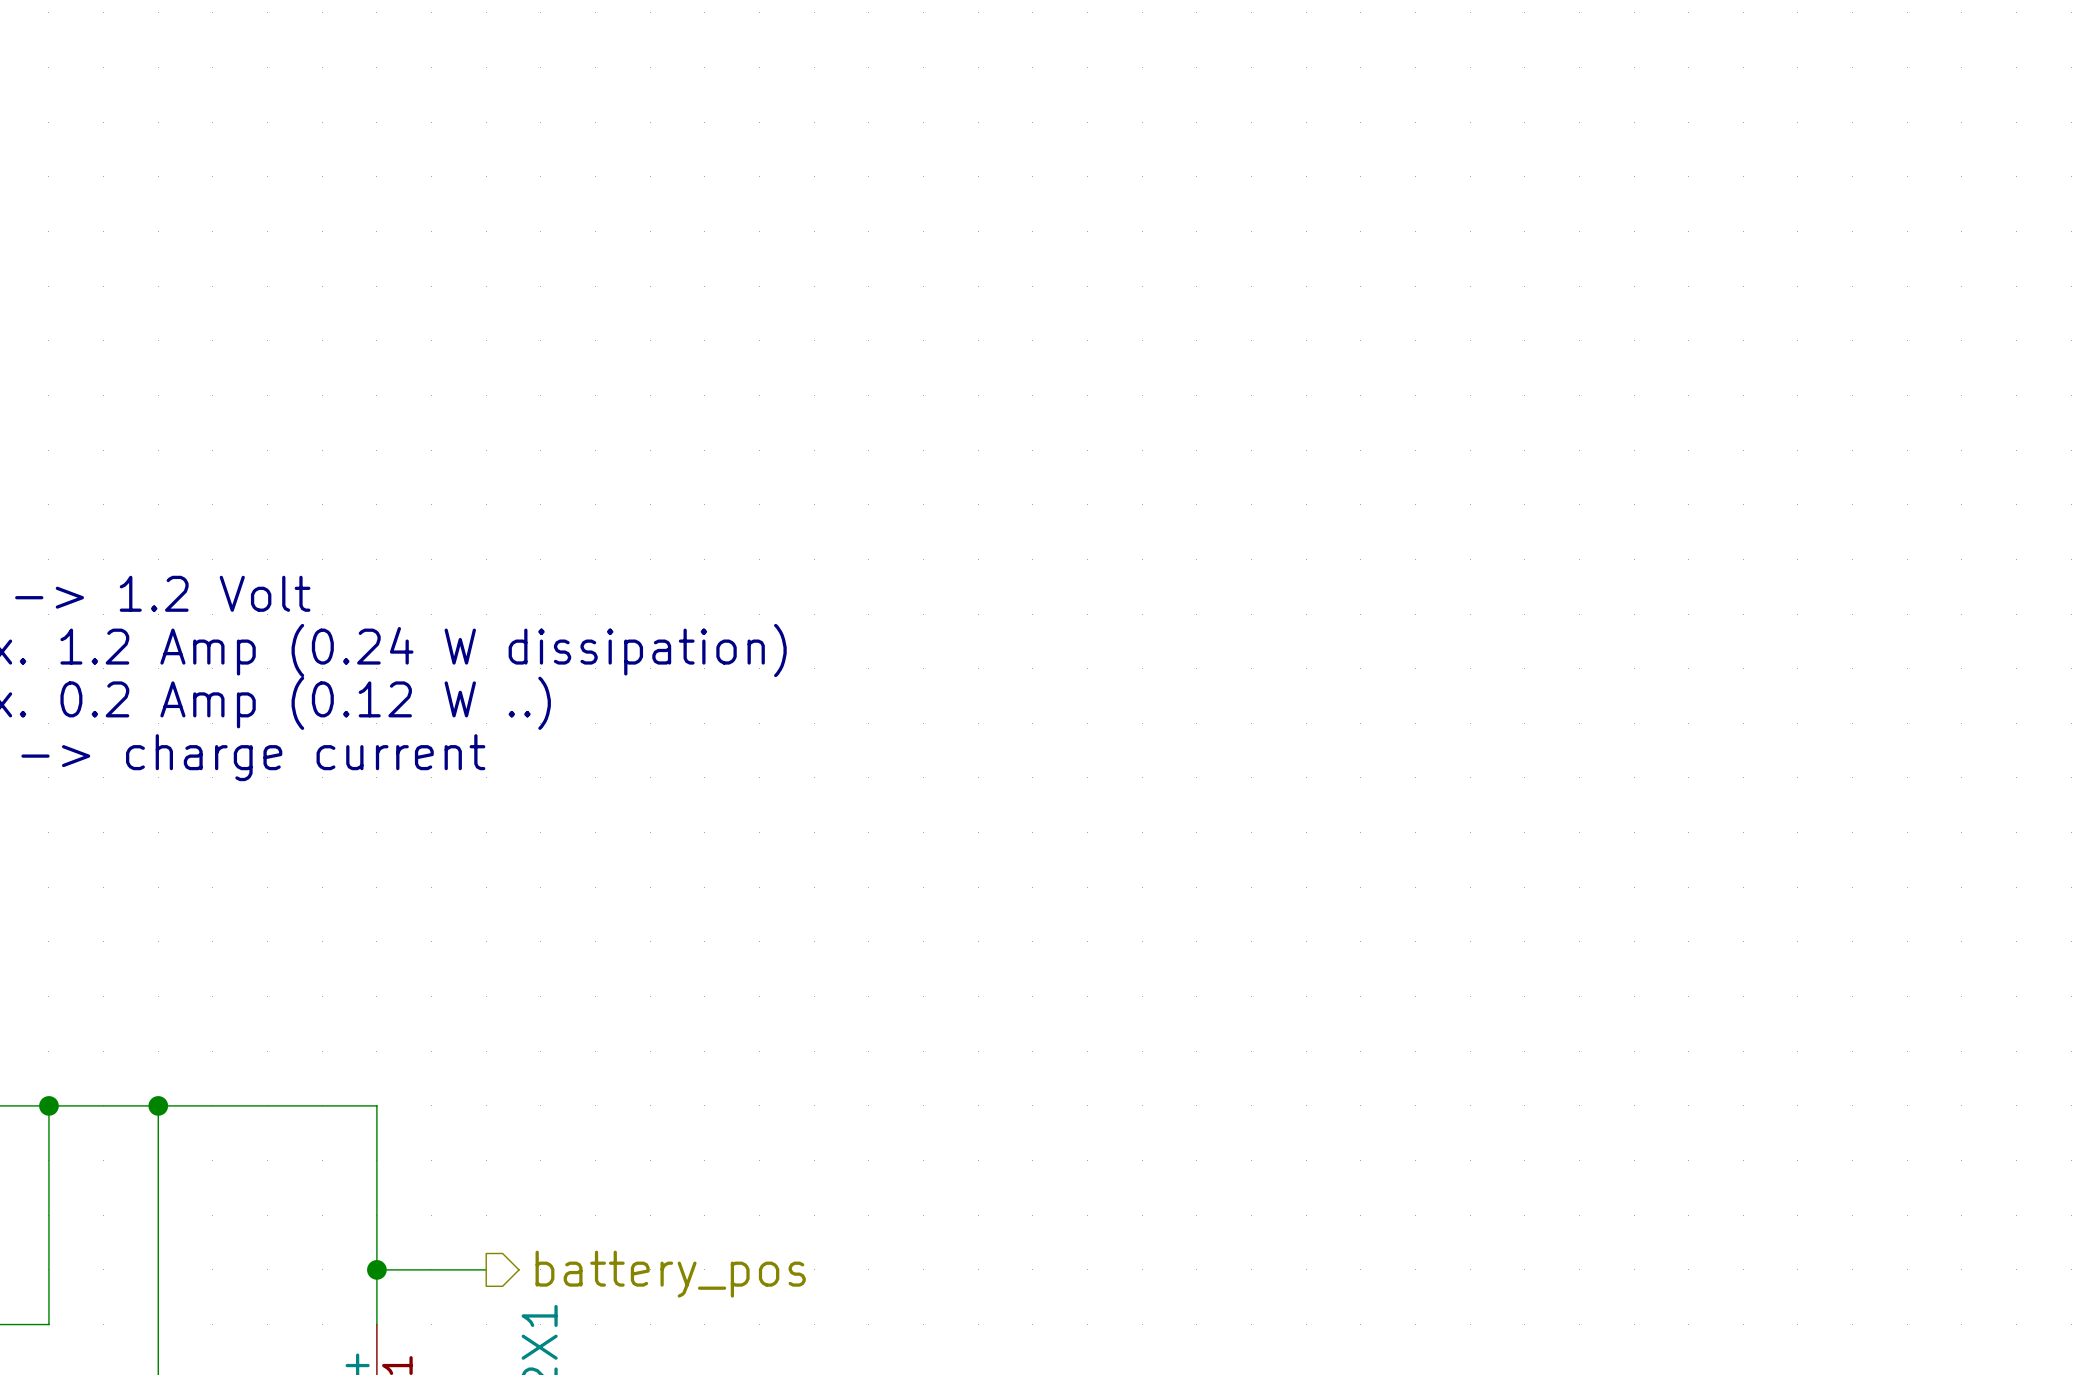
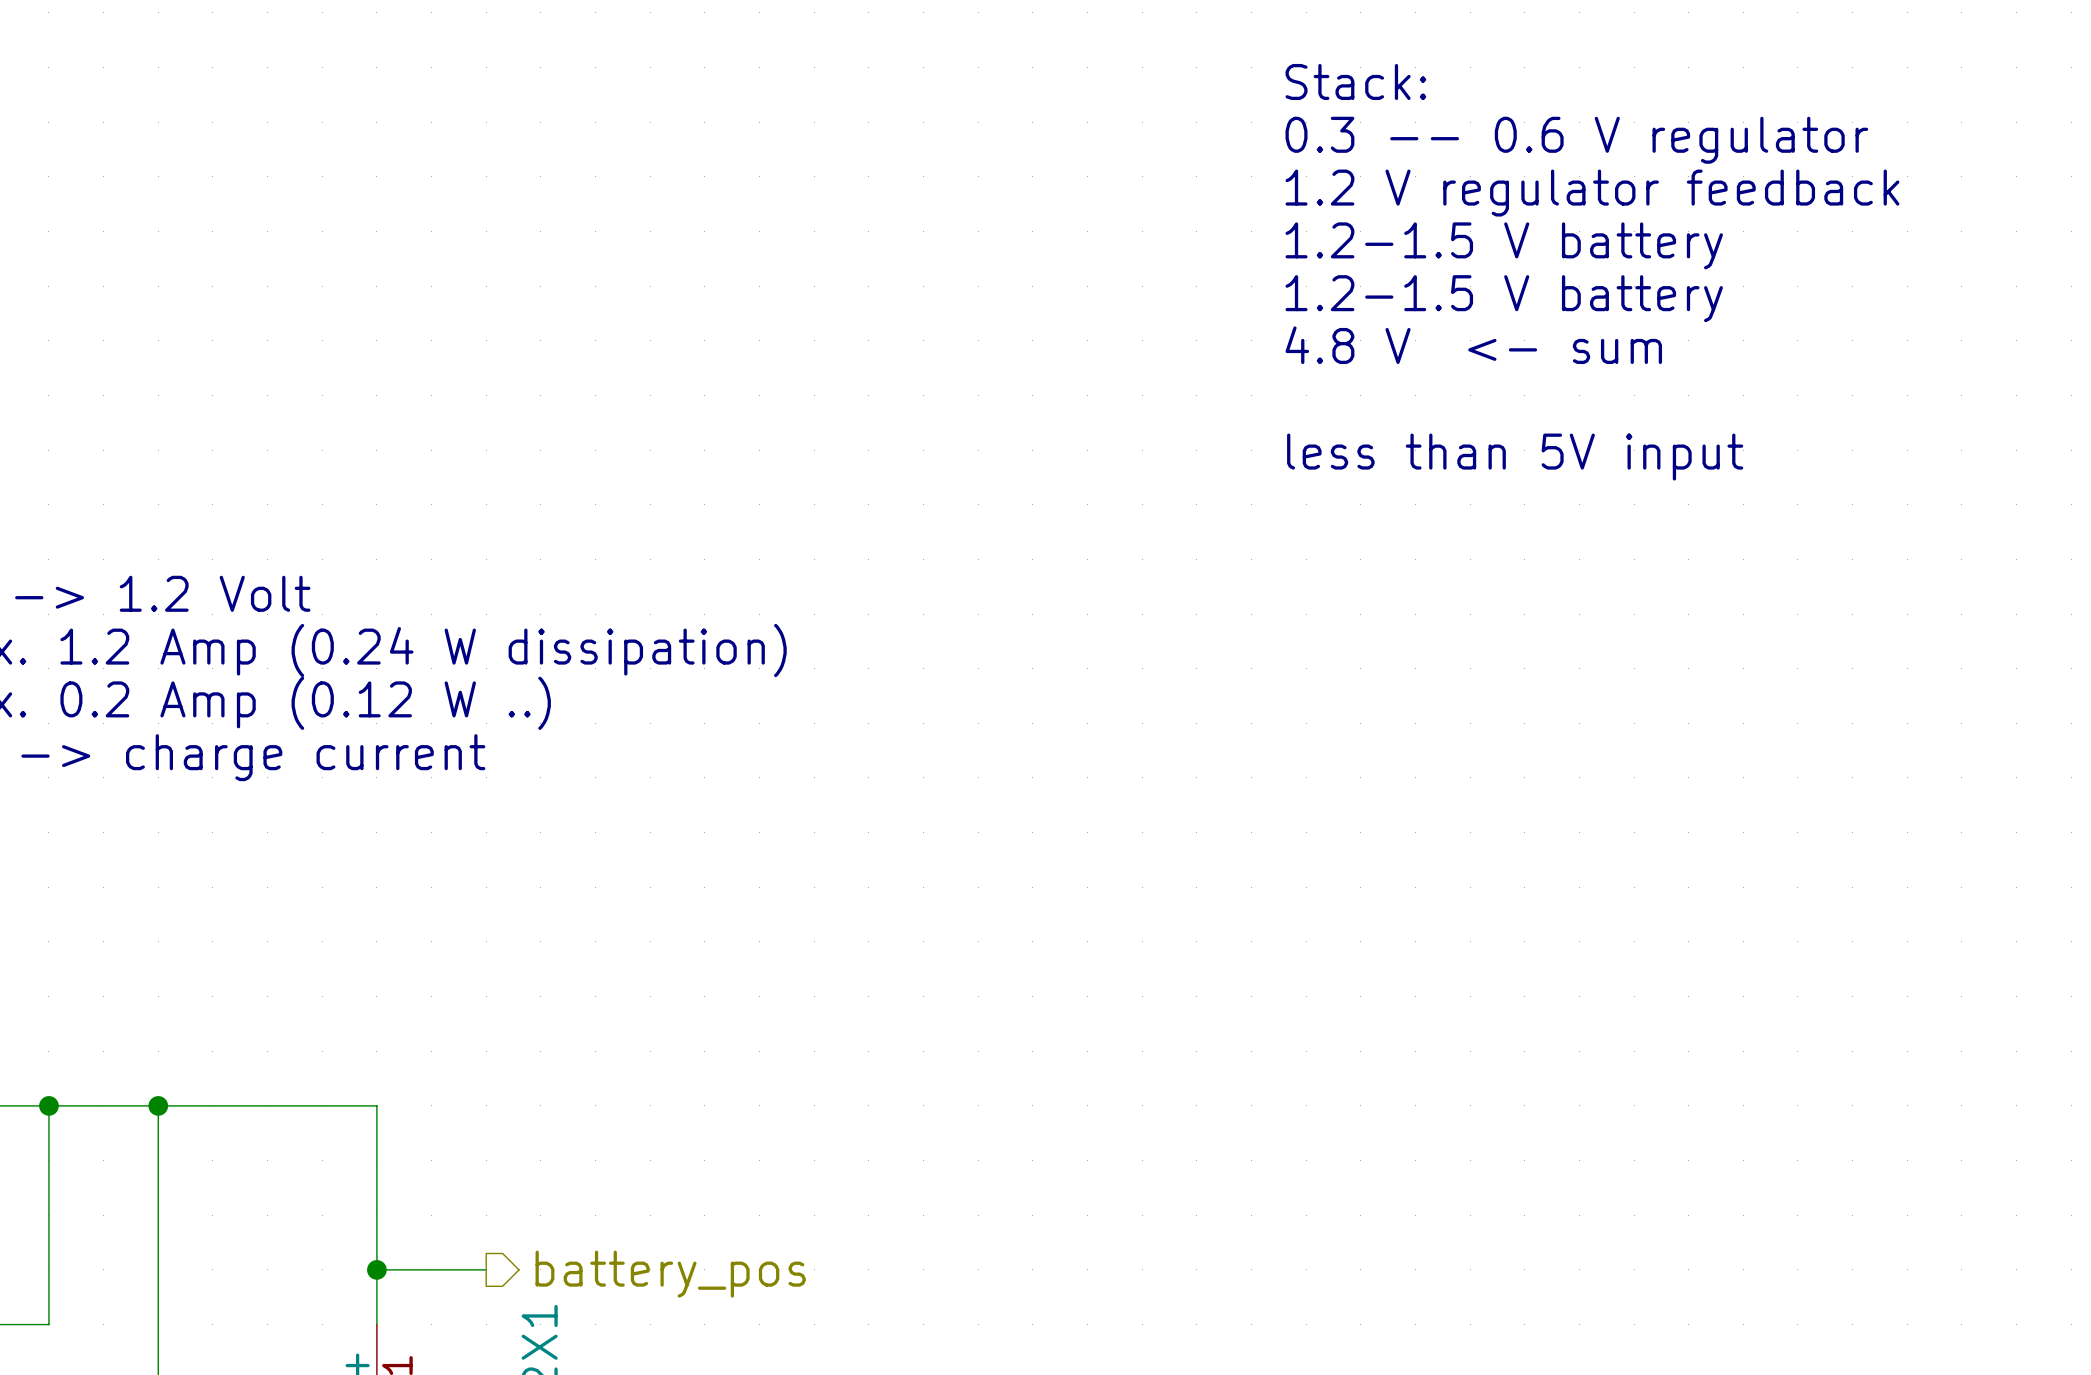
text: none -> Stack: (1355, 81)
text: none -> 0.3 -- 0.6 V regulator (1576, 140)
text: none -> 1.2 V regulator feedback (1592, 193)
text: none -> 1.2-1.5 V battery (1504, 245)
text: none -> 1.2-1.5 V battery (1504, 298)
text: none -> 4.8 V <- sum (1473, 345)
text: none -> less than 5V input (1515, 457)

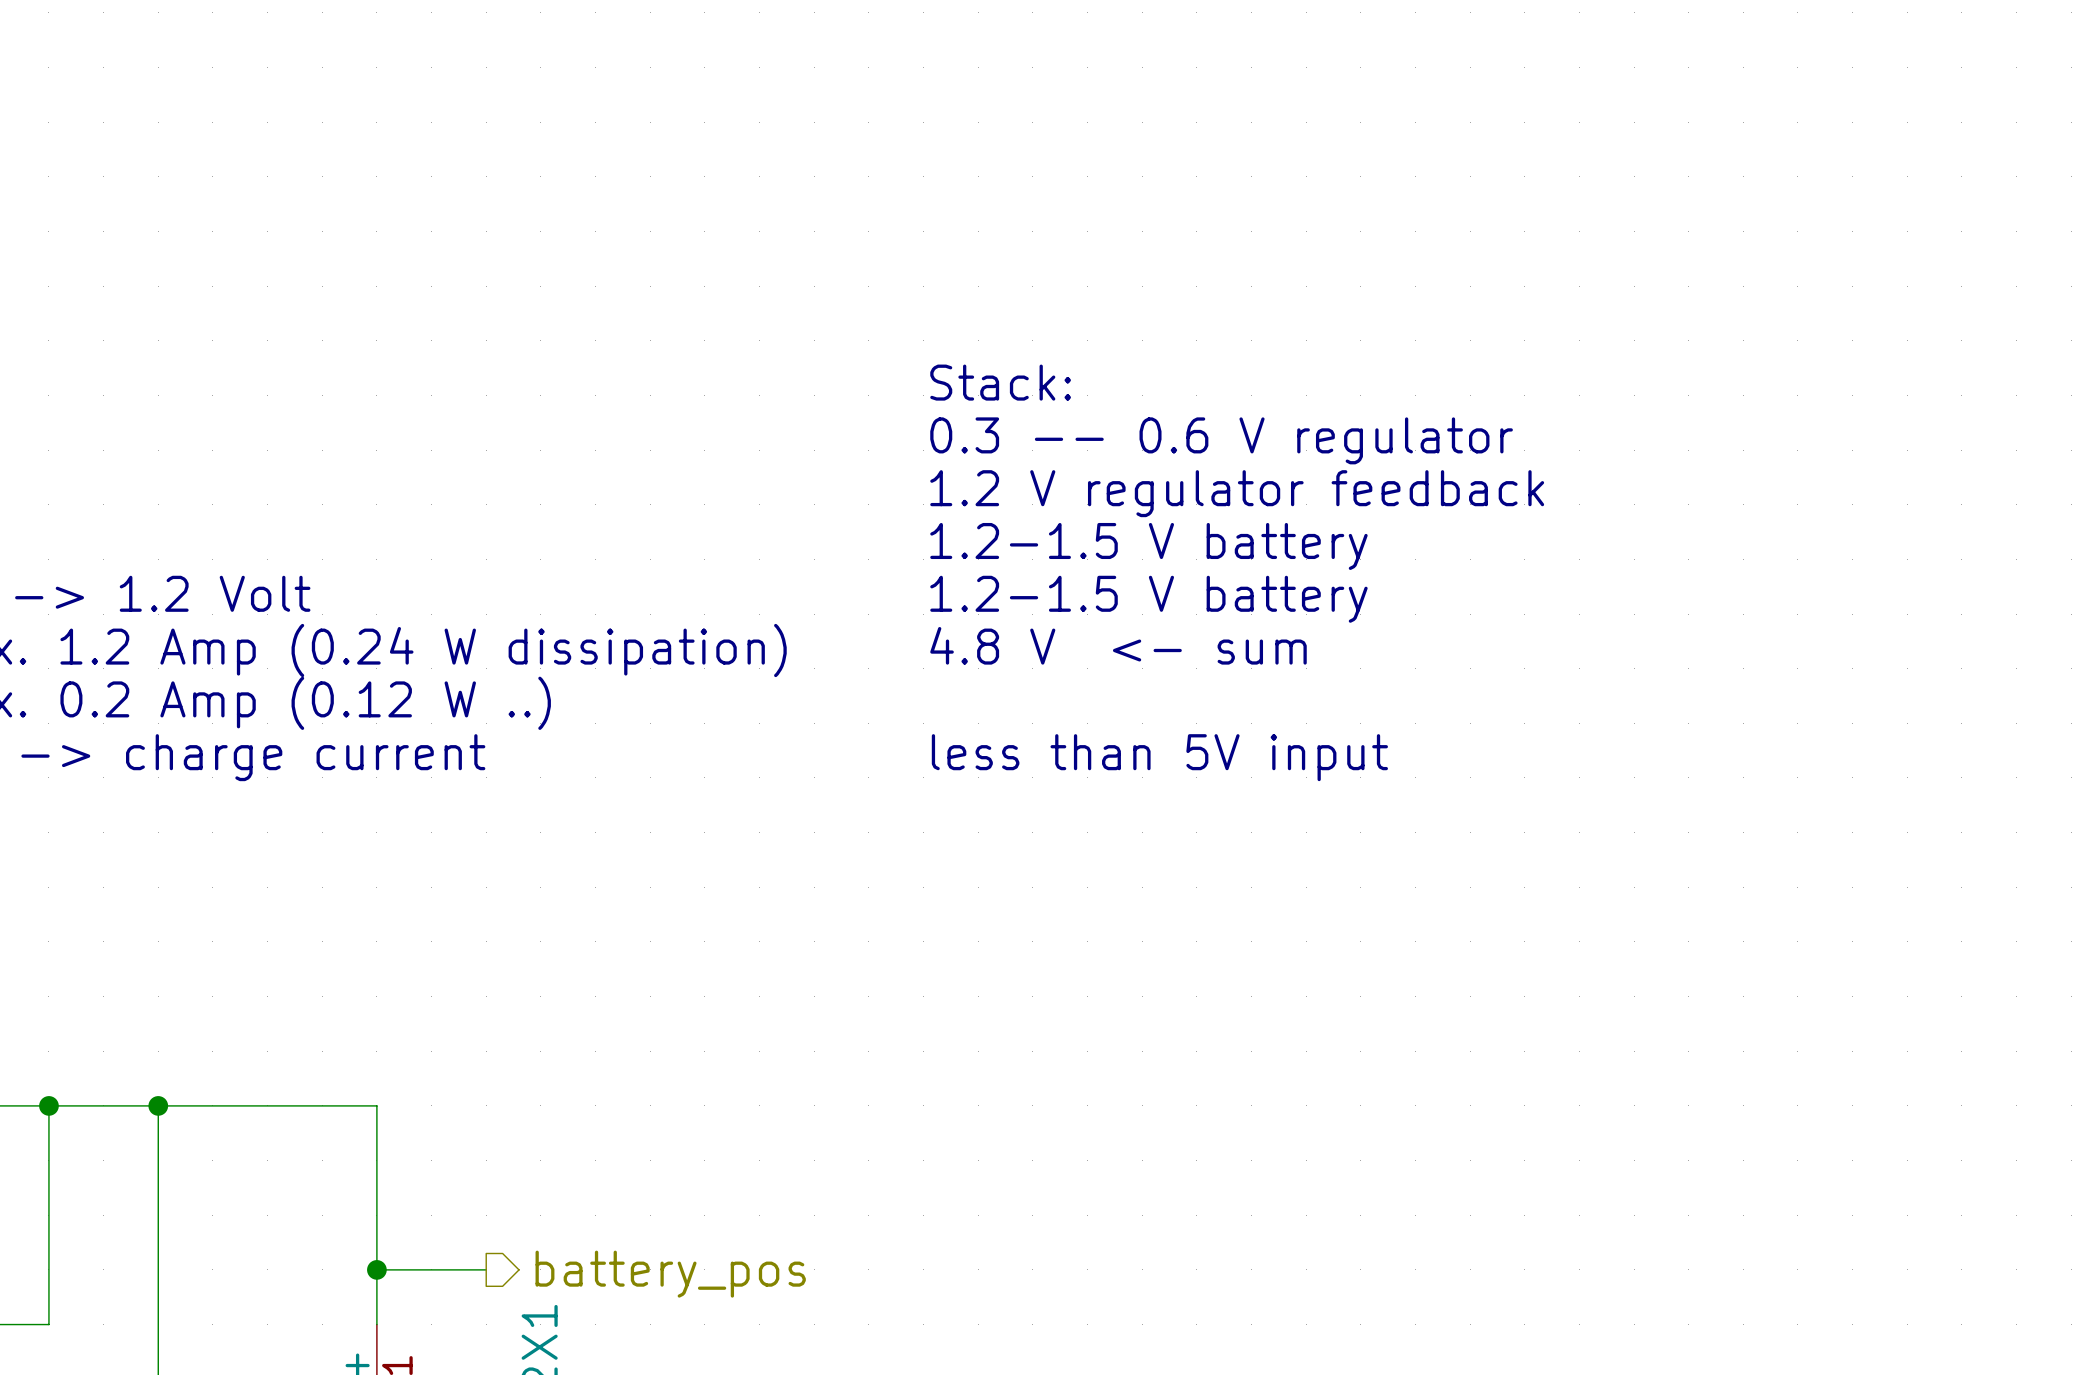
text position: Stack: (1355, 81) -> Stack: (1000, 382)
text position: 0.3 -- 0.6 V regulator (1576, 140) -> 0.3 -- 0.6 V regulator (1221, 440)
text position: 1.2 V regulator feedback (1592, 193) -> 1.2 V regulator feedback (1237, 493)
text: 1.2-1.5 V battery (1504, 245) -> none
text: 1.2-1.5 V battery (1504, 298) -> none
text position: 4.8 V <- sum (1473, 345) -> 4.8 V <- sum (1118, 645)
text position: less than 5V input (1515, 457) -> less than 5V input (1159, 757)
text: none -> 1.2-1.5 V battery (1148, 546)
text: none -> 1.2-1.5 V battery (1148, 599)

